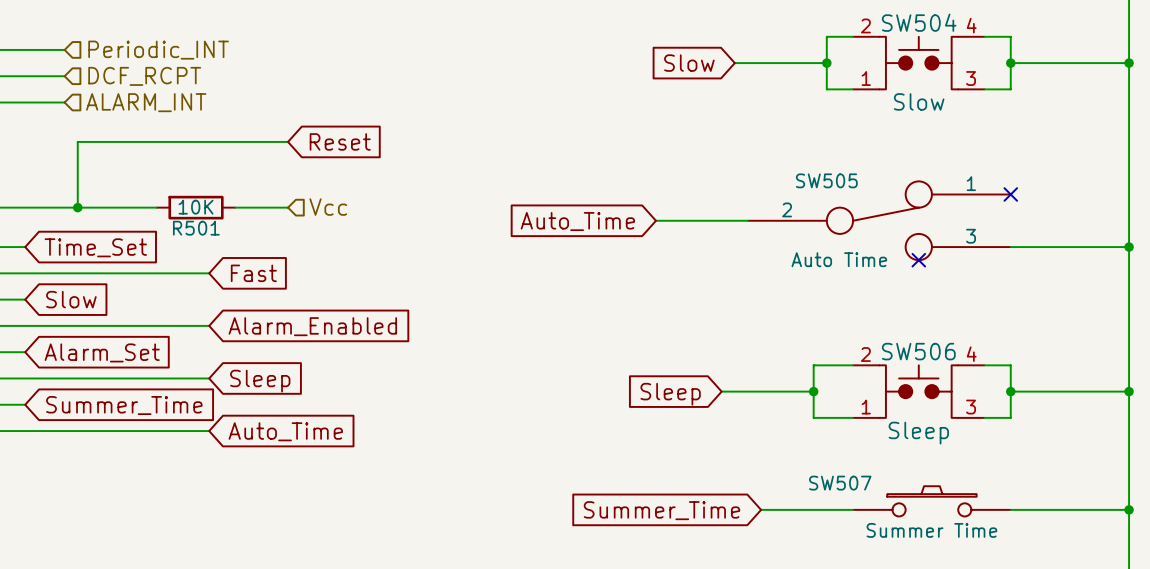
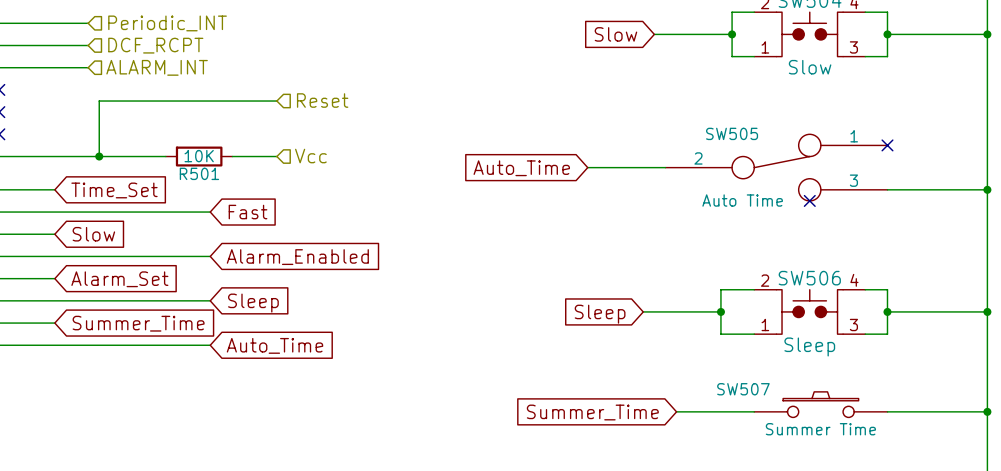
global label: Reset (340, 141) -> none
hierarchical label: none -> Reset (322, 100)

